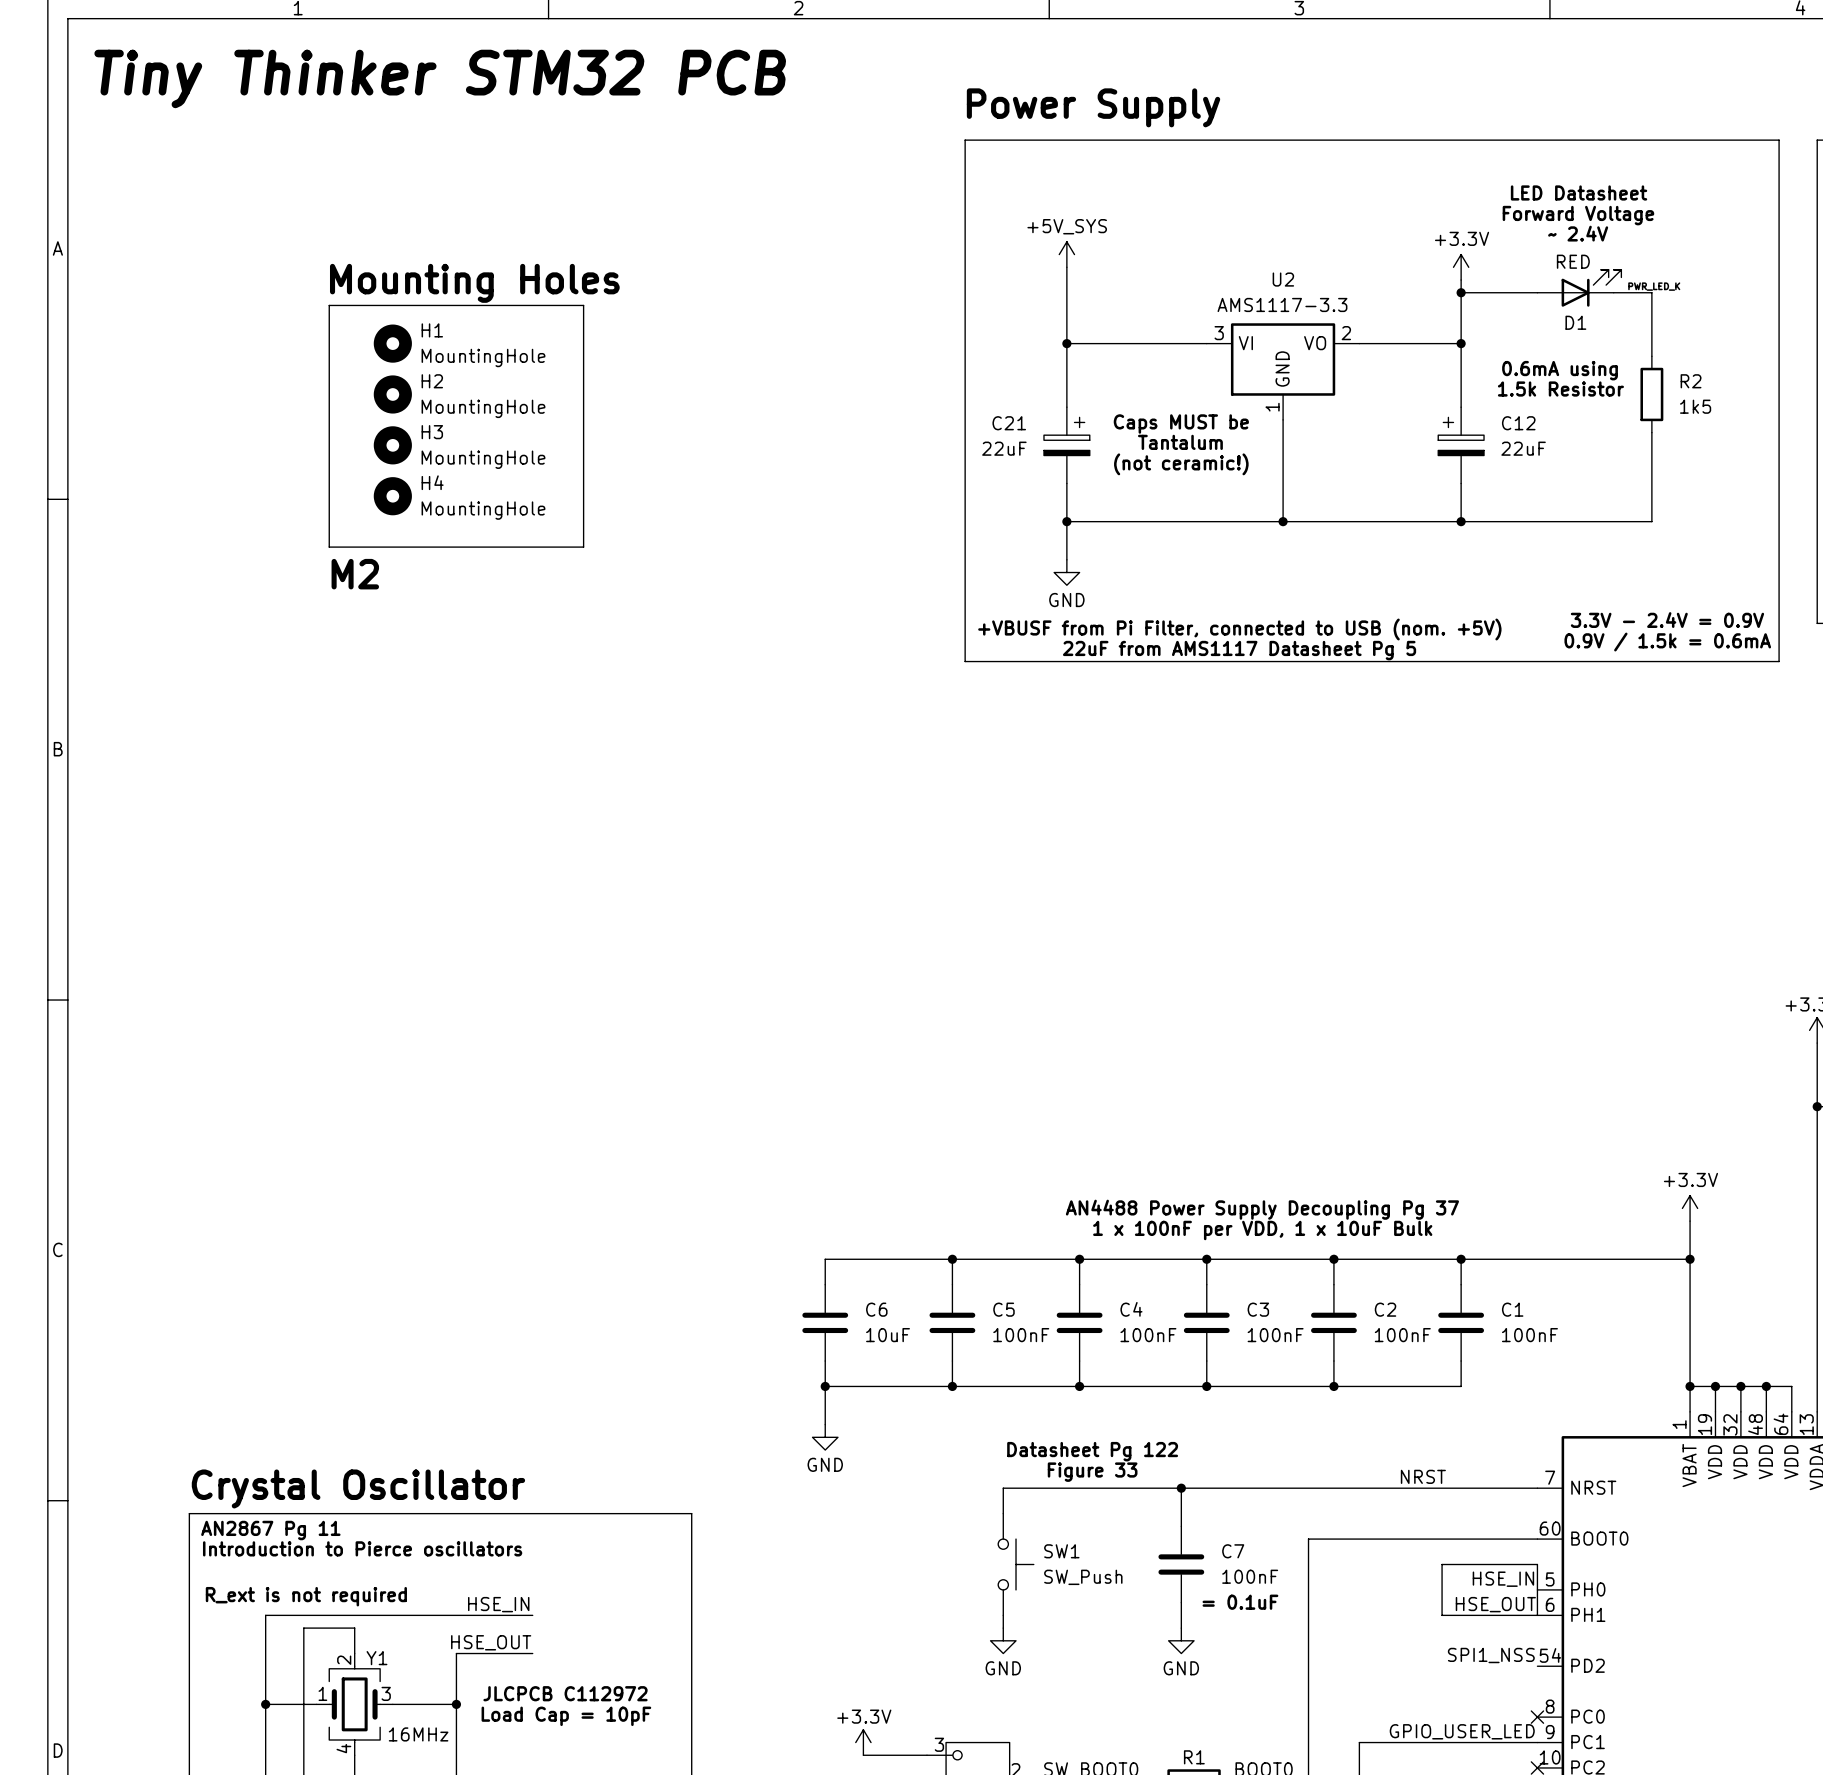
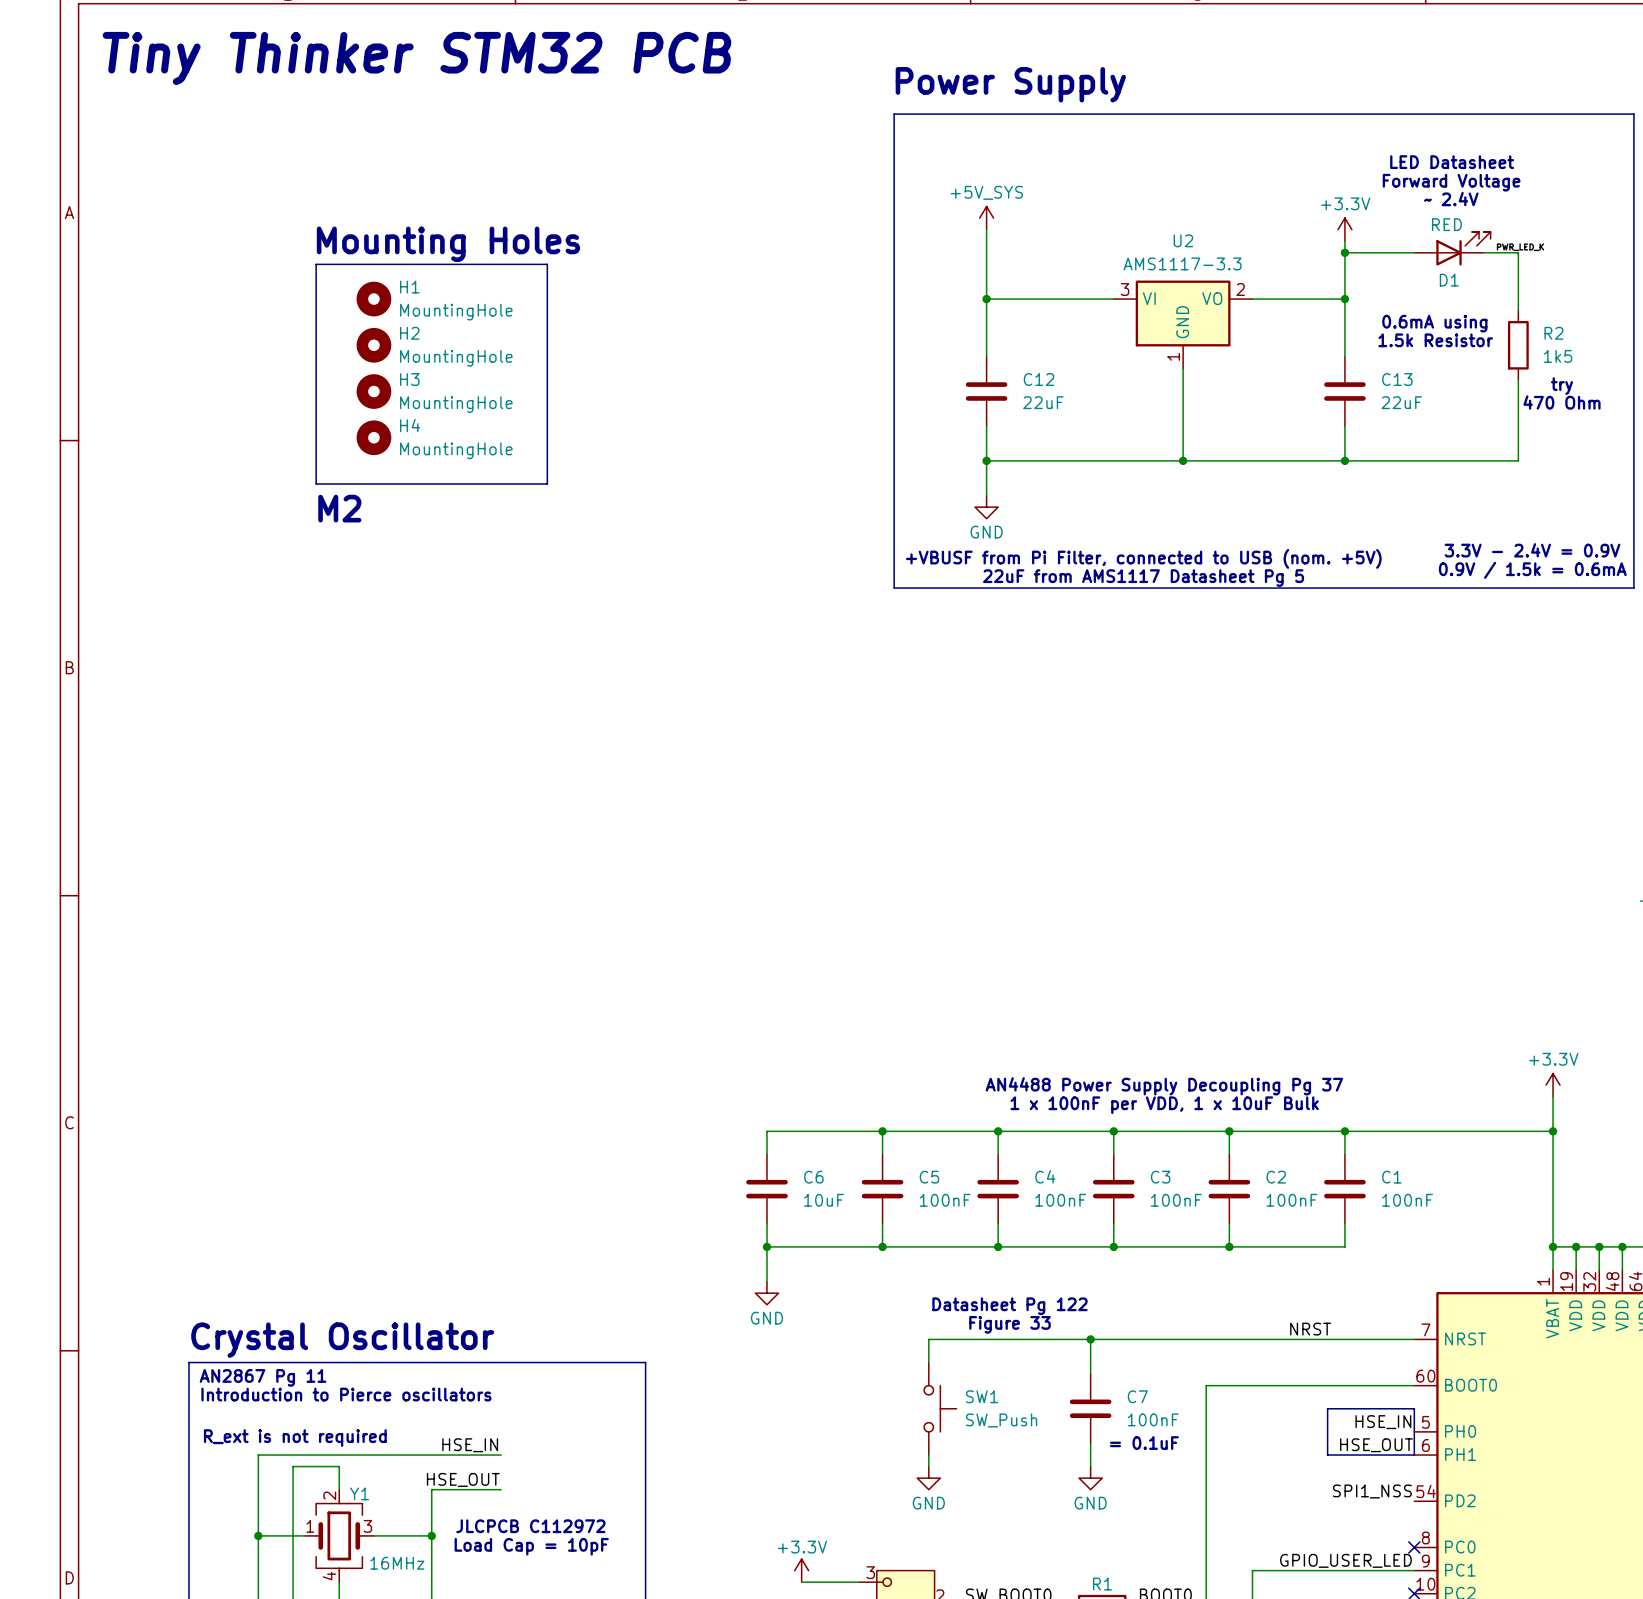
C12 symbol: [1438, 407, 1485, 484] -> [965, 356, 1008, 427]
text: Caps MUST be (1181, 424) -> none
text: none -> try (1562, 386)
text: Tantalum (1180, 442) -> none
C21: 22uF (1066, 445) -> none
C13: none -> 22uF (1344, 391)
text: none -> 470 Ohm (1562, 402)
text: (not ceramic!) (1181, 464) -> none

